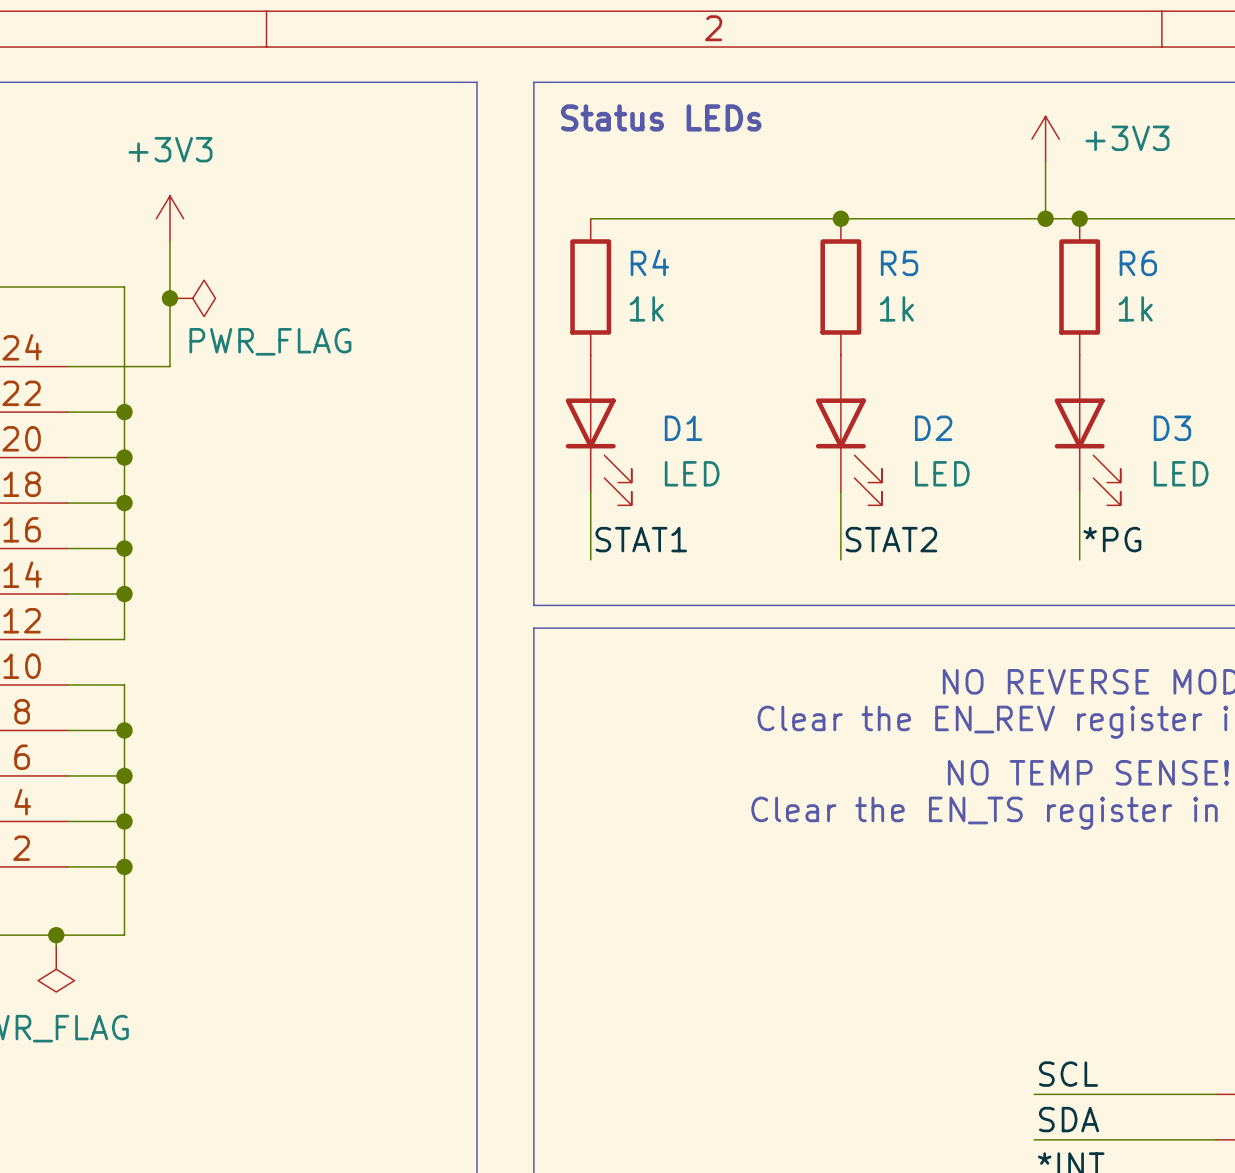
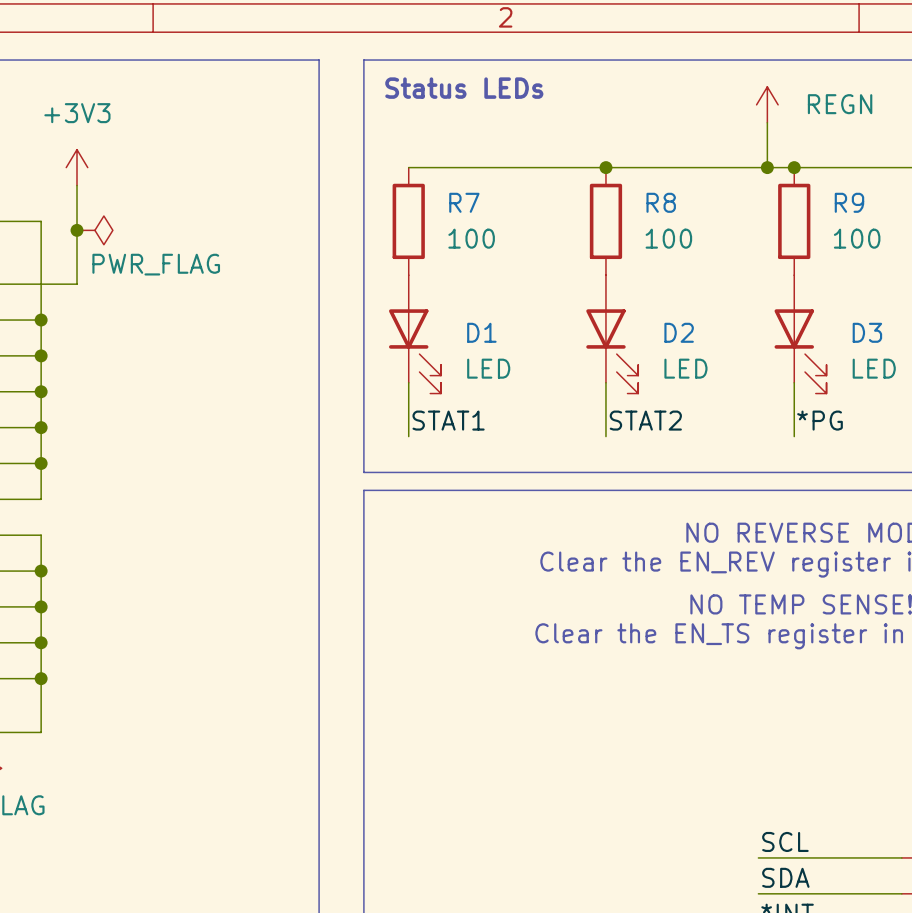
power symbol: +3V3 (1045, 139) -> REGN (767, 104)
R4 name: R4 (649, 262) -> R7 (464, 202)
R5 name: R5 (899, 263) -> R8 (661, 202)
R6 name: R6 (1138, 263) -> R9 (849, 202)
R4 value: 1k (646, 308) -> 100 (471, 238)
R5 value: 1k (896, 308) -> 100 (668, 238)
R6 value: 1k (1135, 308) -> 100 (857, 238)

